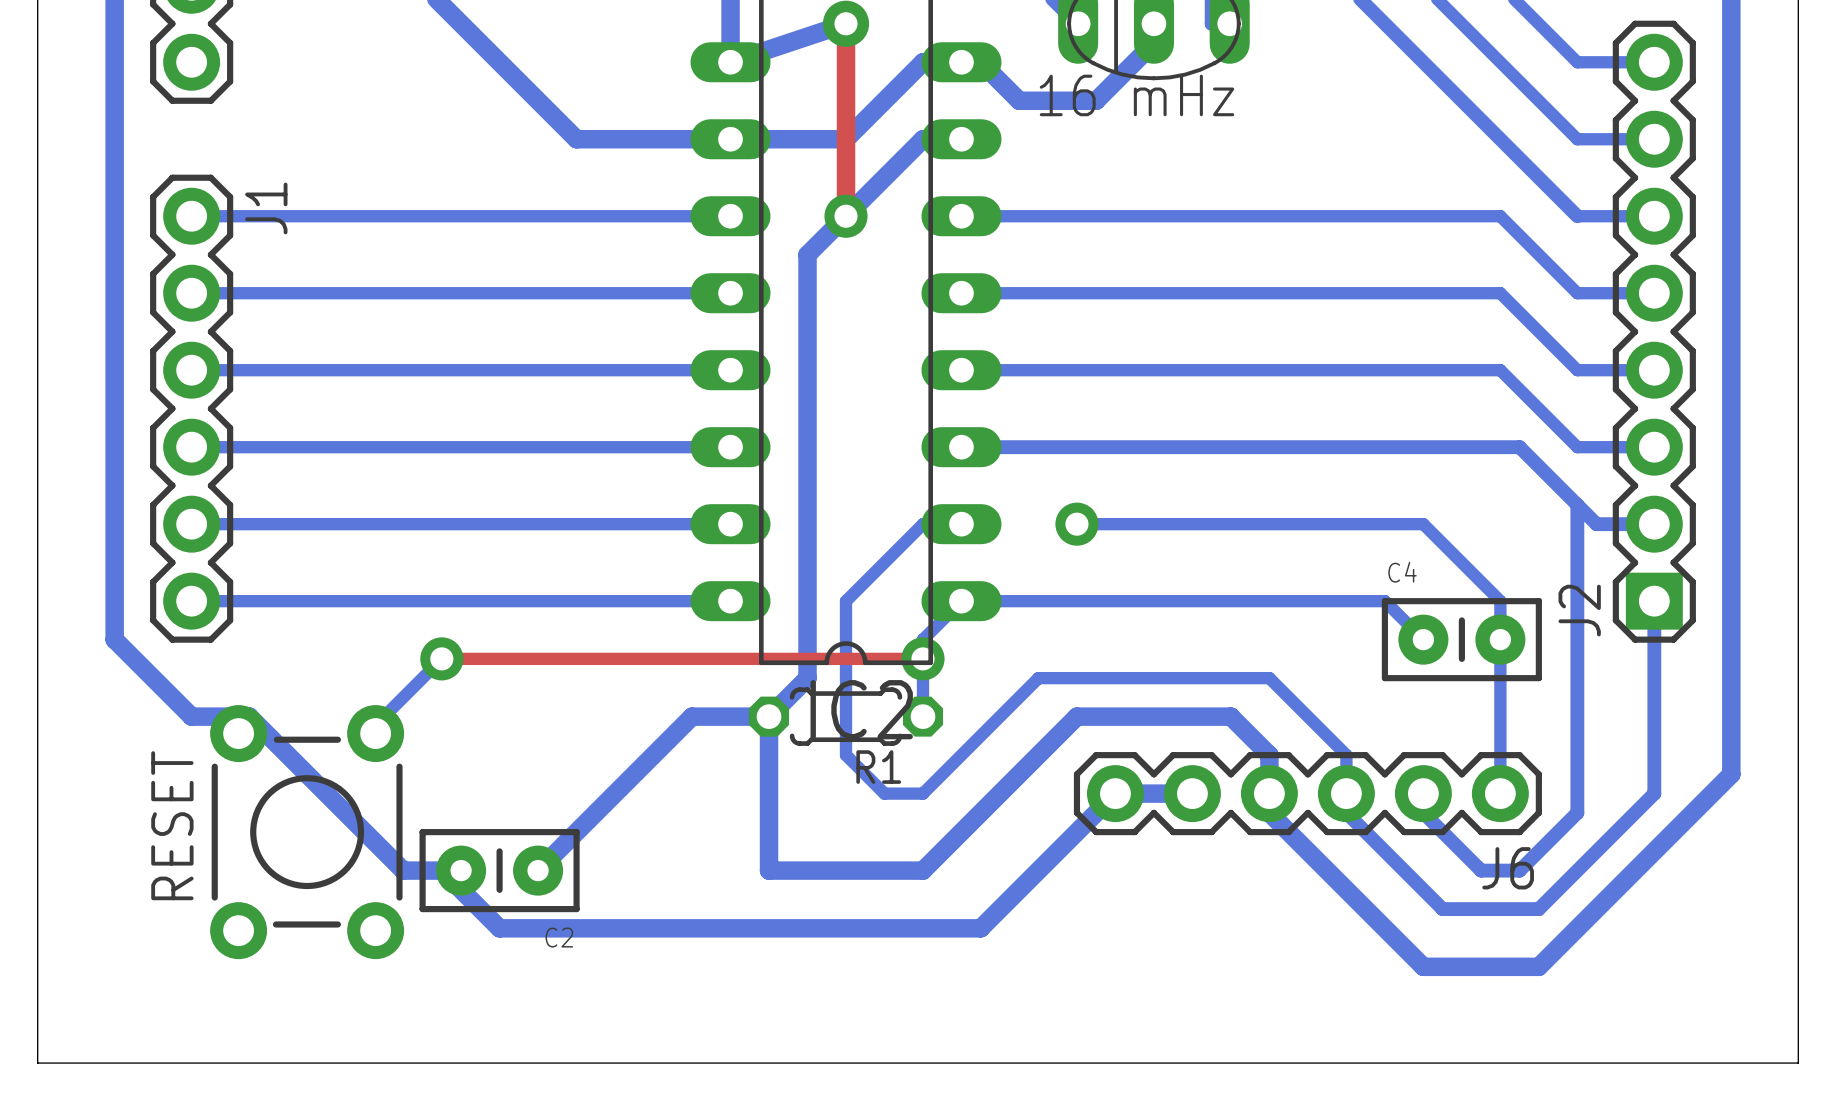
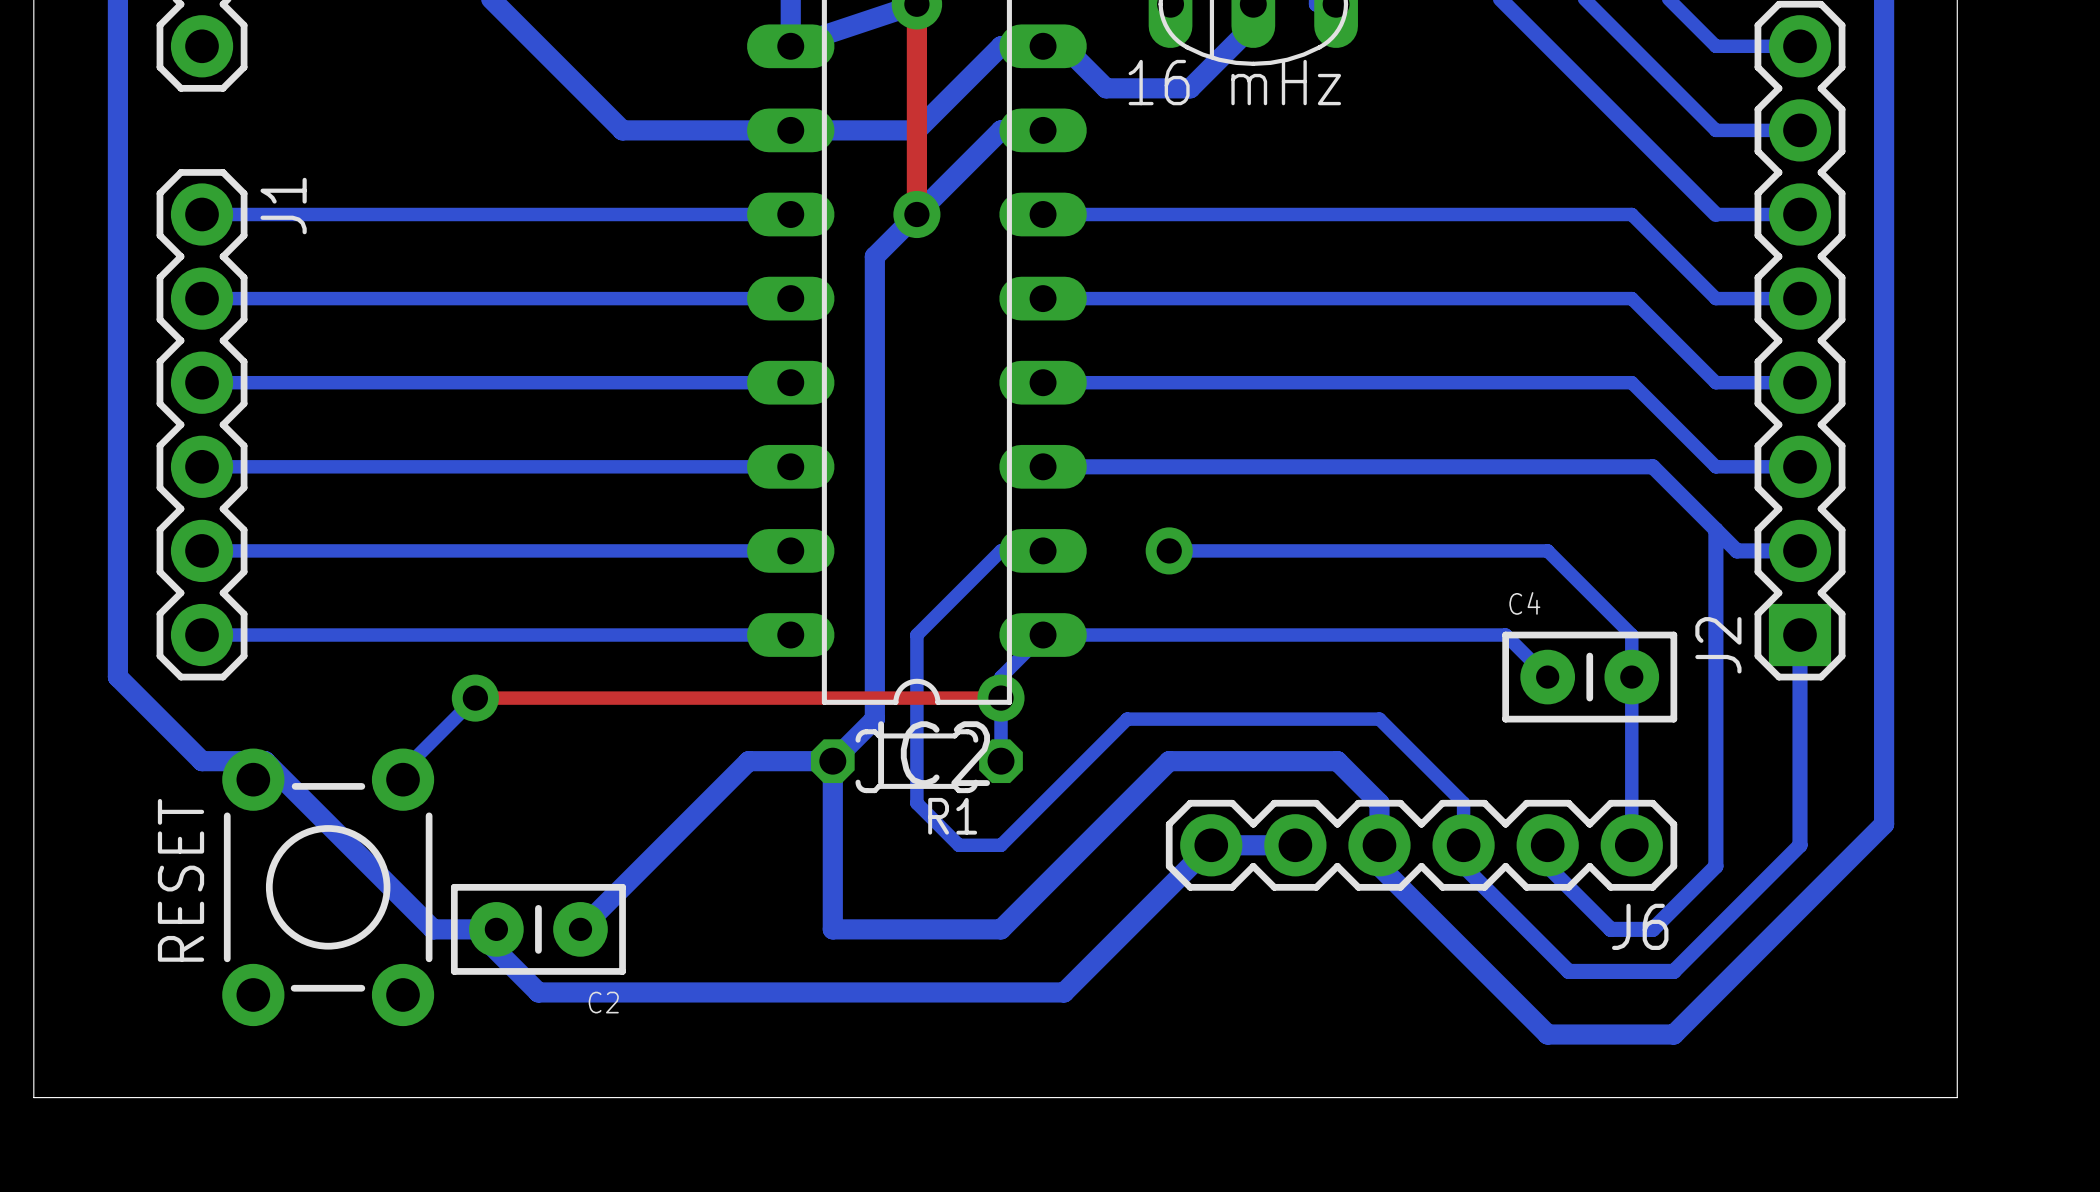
board edge: (37, 1024) (37, 1063) (1798, 1063) (1798, 1024) -> (33, 1097) (1957, 1097)

